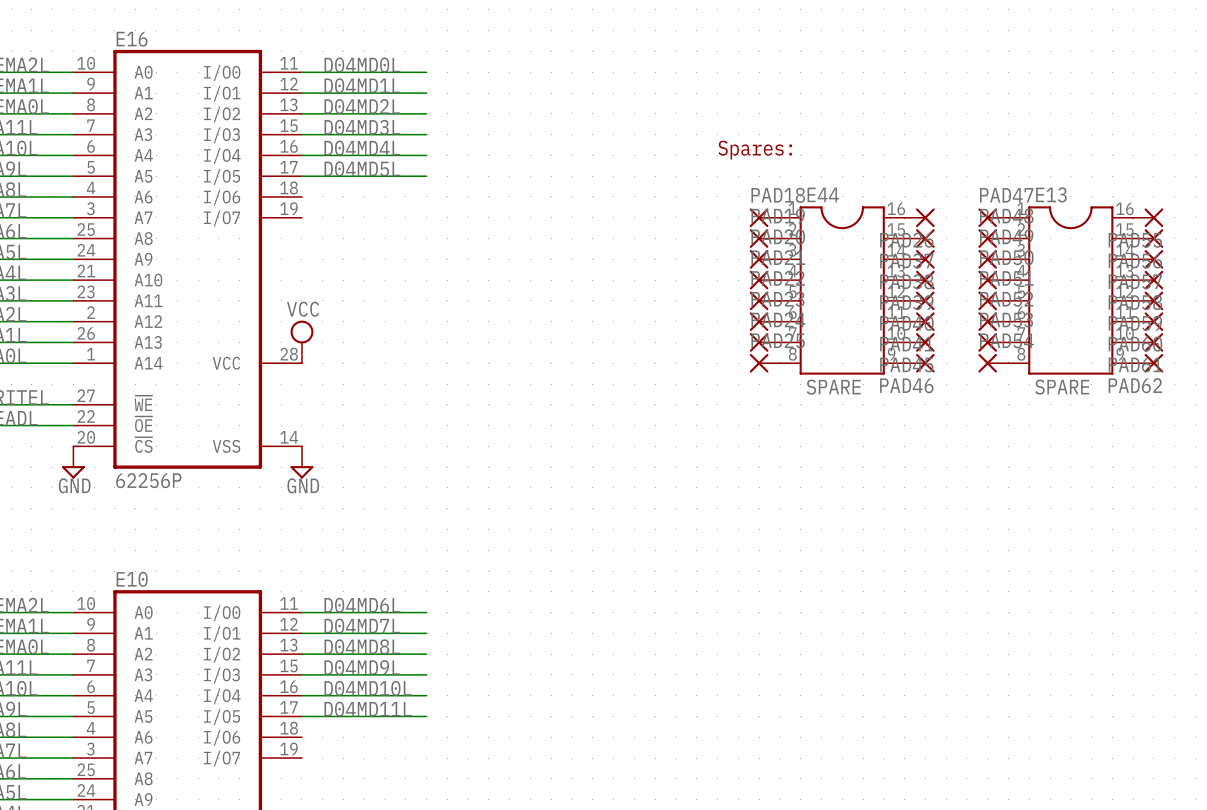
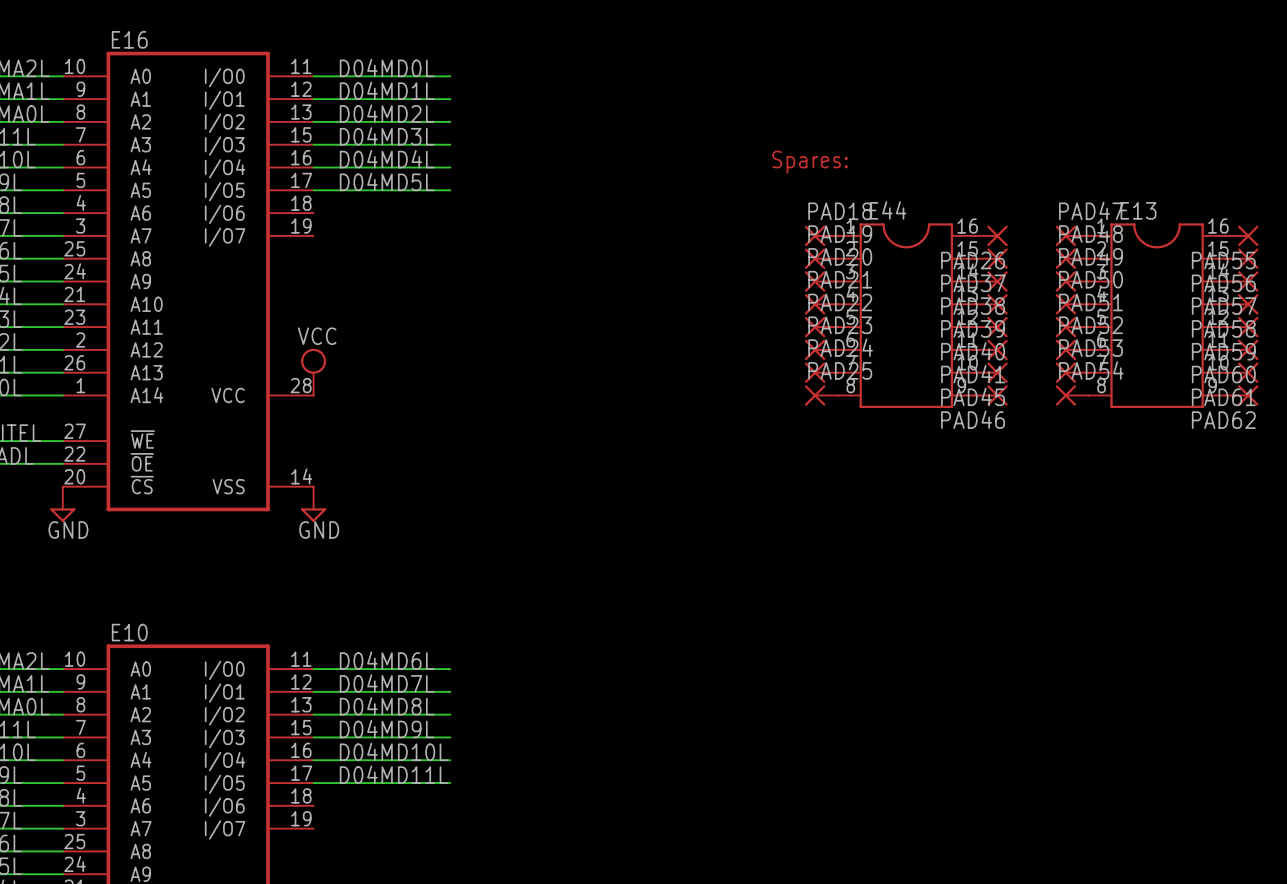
E44 value: SPARE (833, 387) -> none
E13 value: SPARE (1062, 387) -> none
E16 value: 62256P (148, 480) -> none

